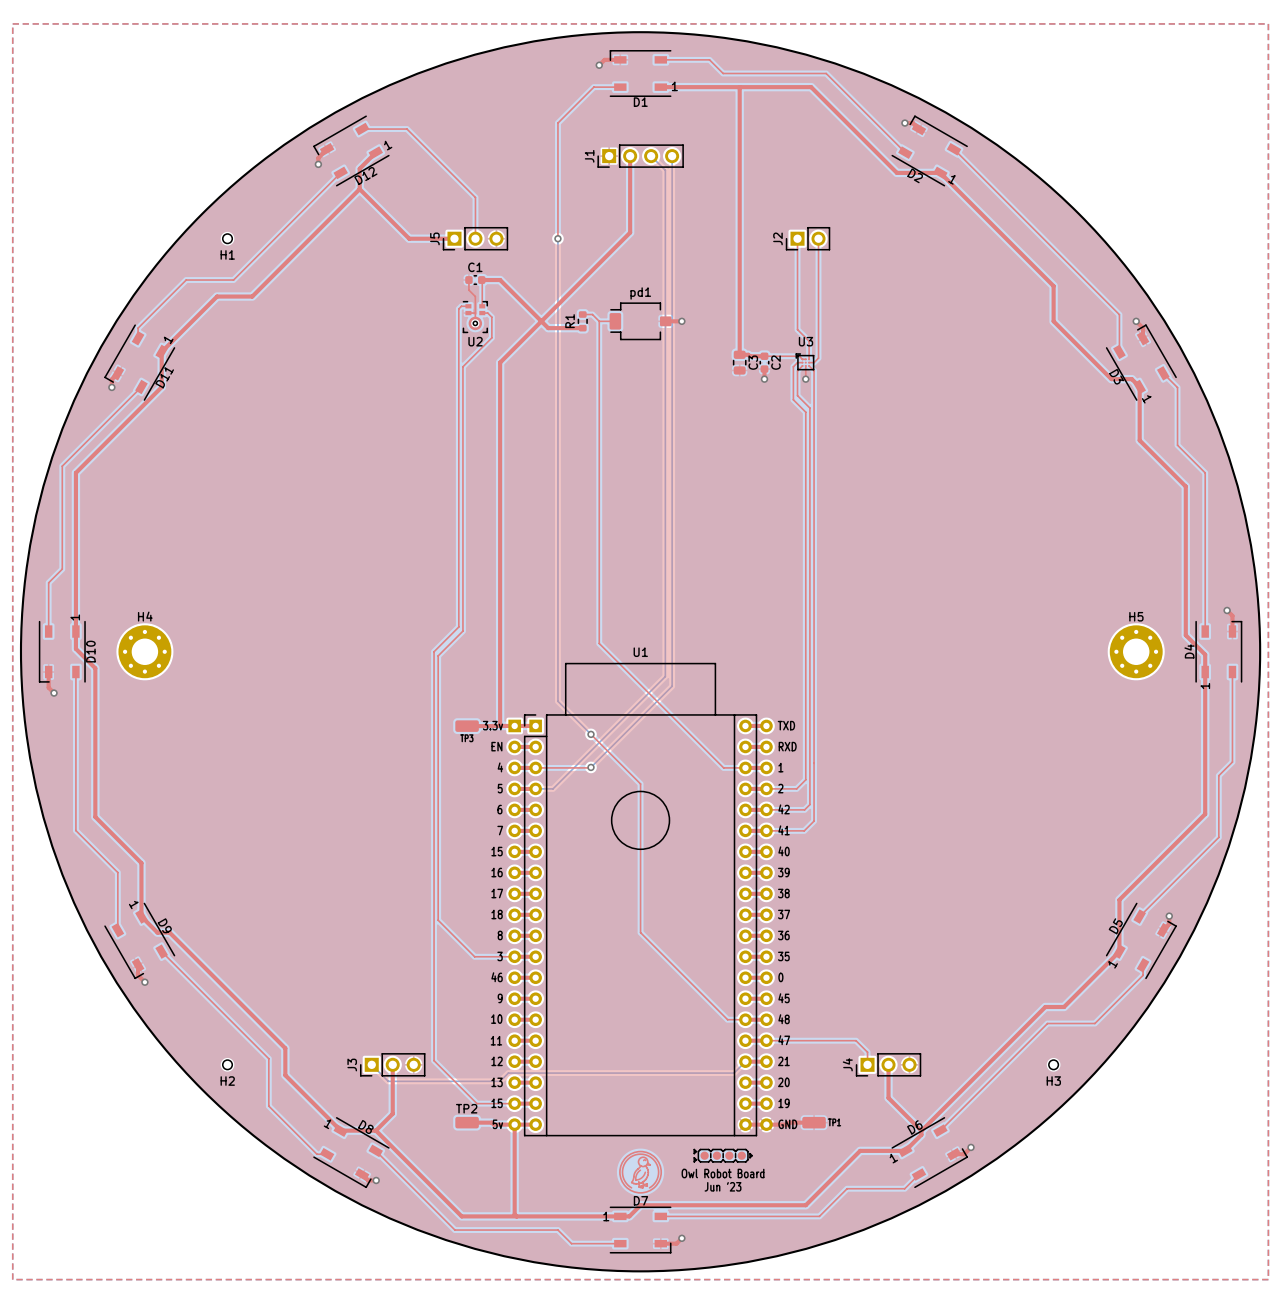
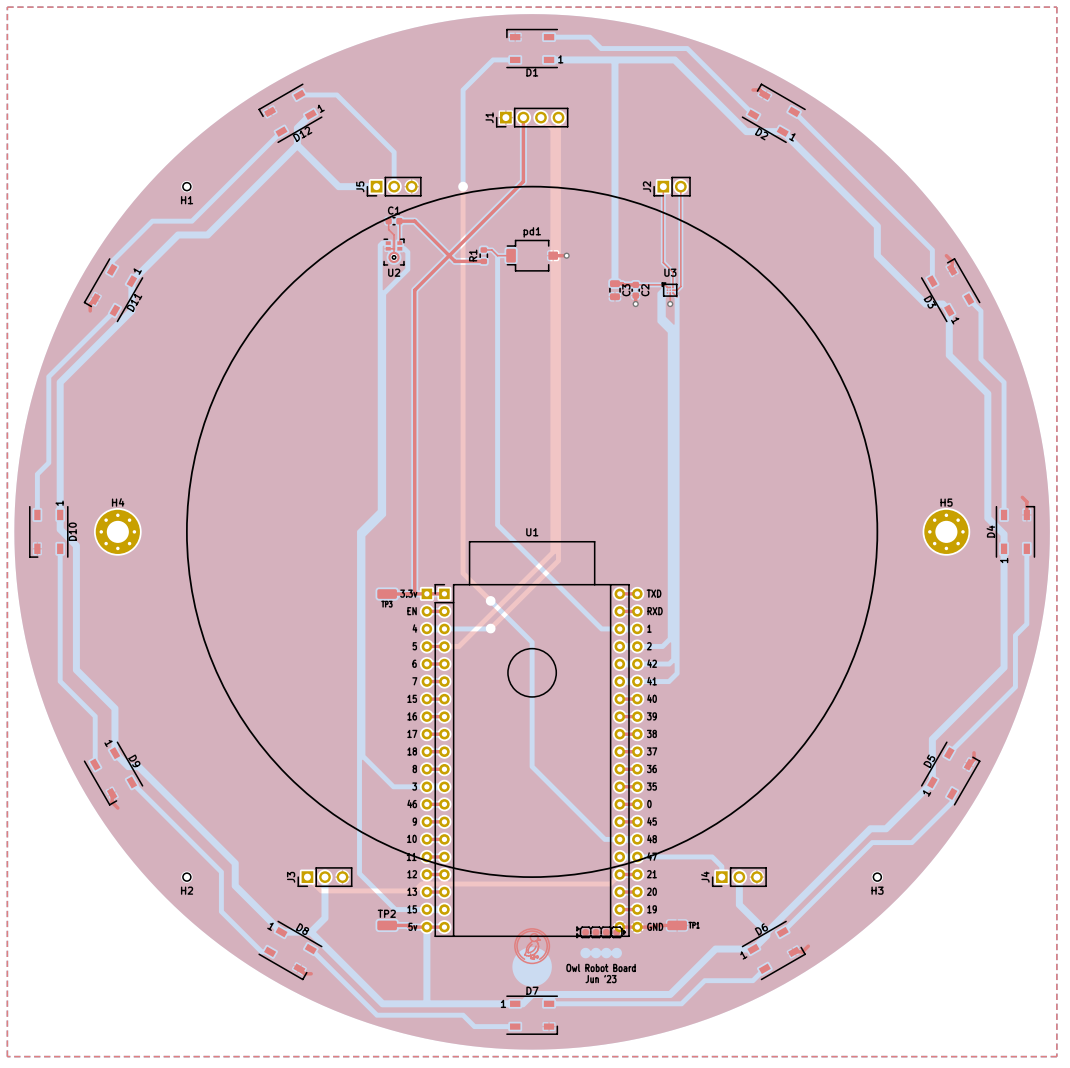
round board edge size: [19, 31, 1262, 1273] -> [186, 185, 879, 878]
top track: (620, 59) (604, 59) (599, 65) -> none
top track: (660, 59) (709, 59) (723, 73) (826, 73) (905, 152) -> none
via: (599, 65) -> none
top track: (620, 87) (593, 87) (557, 123) (557, 238) -> none
top track: (660, 87) (811, 87) (896, 172) (940, 172) (1053, 286) (1053, 321) (1111, 379) (1131, 379) (1139, 386) (1139, 440) (1185, 486) (1185, 635) (1205, 654) (1205, 814) (1119, 899) (1119, 951) (1064, 1006) (1045, 1006) (921, 1130) -> none
top track: (739, 87) (739, 354) -> none
via: (904, 123) -> none
top track: (362, 129) (406, 129) (475, 197) (475, 238) -> none
top track: (327, 149) (318, 157) (318, 164) -> none
top track: (954, 149) (1119, 314) (1119, 351) -> none
top track: (375, 152) (359, 168) (359, 189) -> none
bottom track: (651, 156) (665, 170) (665, 676) (553, 788) (514, 788) -> none
bottom track: (672, 156) (672, 686) (591, 767) -> none
via: (318, 164) -> none
top track: (340, 172) (233, 280) (186, 280) (138, 328) (138, 338) -> none
top track: (359, 189) (252, 296) (217, 296) (161, 351) (161, 387) (75, 472) (75, 648) (95, 668) (95, 816) (141, 863) (141, 916) (157, 932) (169, 932) (285, 1048) (285, 1075) (340, 1130) (375, 1130) -> none
top track: (359, 189) (409, 238) (454, 238) -> none
bottom track: (557, 238) (557, 701) (591, 734) -> none
via: (557, 238) -> none
top track: (468, 306) (461, 306) (458, 308) (458, 626) (434, 651) (434, 1060) (477, 1103) (535, 1103) -> none
top track: (482, 313) (487, 313) (491, 317) (491, 337) (462, 366) (462, 631) (438, 655) (438, 920) (474, 956) (535, 956) -> none
top track: (599, 321) (599, 643) (723, 767) (766, 767) -> none
via: (1136, 321) -> none
top track: (802, 362) (797, 362) (793, 366) (793, 399) (805, 412) (805, 779) (796, 788) (745, 788) -> none
top track: (802, 365) (797, 370) (797, 395) (809, 408) (809, 804) (804, 809) (745, 809) -> none
top track: (814, 370) (814, 821) (804, 830) (745, 830) -> none
top track: (1163, 373) (1177, 387) (1177, 445) (1205, 472) (1205, 631) -> none
top track: (141, 386) (62, 466) (62, 569) (48, 582) (48, 631) -> none
via: (111, 387) -> none
via: (1227, 610) -> none
top track: (48, 672) (48, 687) (54, 693) -> none
top track: (75, 672) (75, 830) (117, 872) (117, 930) -> none
top track: (1232, 672) (1232, 762) (1218, 775) (1218, 837) (1139, 916) -> none
via: (54, 693) -> none
top track: (591, 734) (640, 783) (640, 932) (727, 1019) (766, 1019) -> none
via: (591, 734) -> none
top track: (591, 767) (514, 767) -> none
via: (591, 767) -> none
via: (1169, 916) -> none
top track: (161, 951) (268, 1058) (268, 1106) (316, 1154) (327, 1154) -> none
top track: (1143, 965) (1143, 975) (1094, 1023) (1047, 1023) (940, 1130) -> none
via: (144, 982) -> none
top track: (745, 1040) (856, 1040) (867, 1052) (867, 1064) -> none
bottom track: (745, 1061) (734, 1073) (508, 1073) (500, 1081) (388, 1081) (371, 1064) -> none
top track: (392, 1064) (392, 1113) (375, 1130) -> none
top track: (888, 1064) (888, 1097) (921, 1130) -> none
top track: (514, 1124) (514, 1214) (516, 1216) -> none
top track: (375, 1130) (461, 1216) (629, 1216) (640, 1205) (805, 1205) (860, 1150) (905, 1150) (921, 1134) (921, 1130) -> none
via: (971, 1147) -> none
top track: (375, 1150) (454, 1230) (557, 1230) (571, 1243) (620, 1243) -> none
drawing position: (723, 1155) -> (601, 932)
drawing position: (640, 1172) -> (532, 946)
top track: (918, 1174) (904, 1188) (847, 1188) (819, 1216) (660, 1216) -> none
via: (376, 1180) -> none
top track: (681, 1238) (676, 1243) (660, 1243) -> none
via: (681, 1238) -> none

